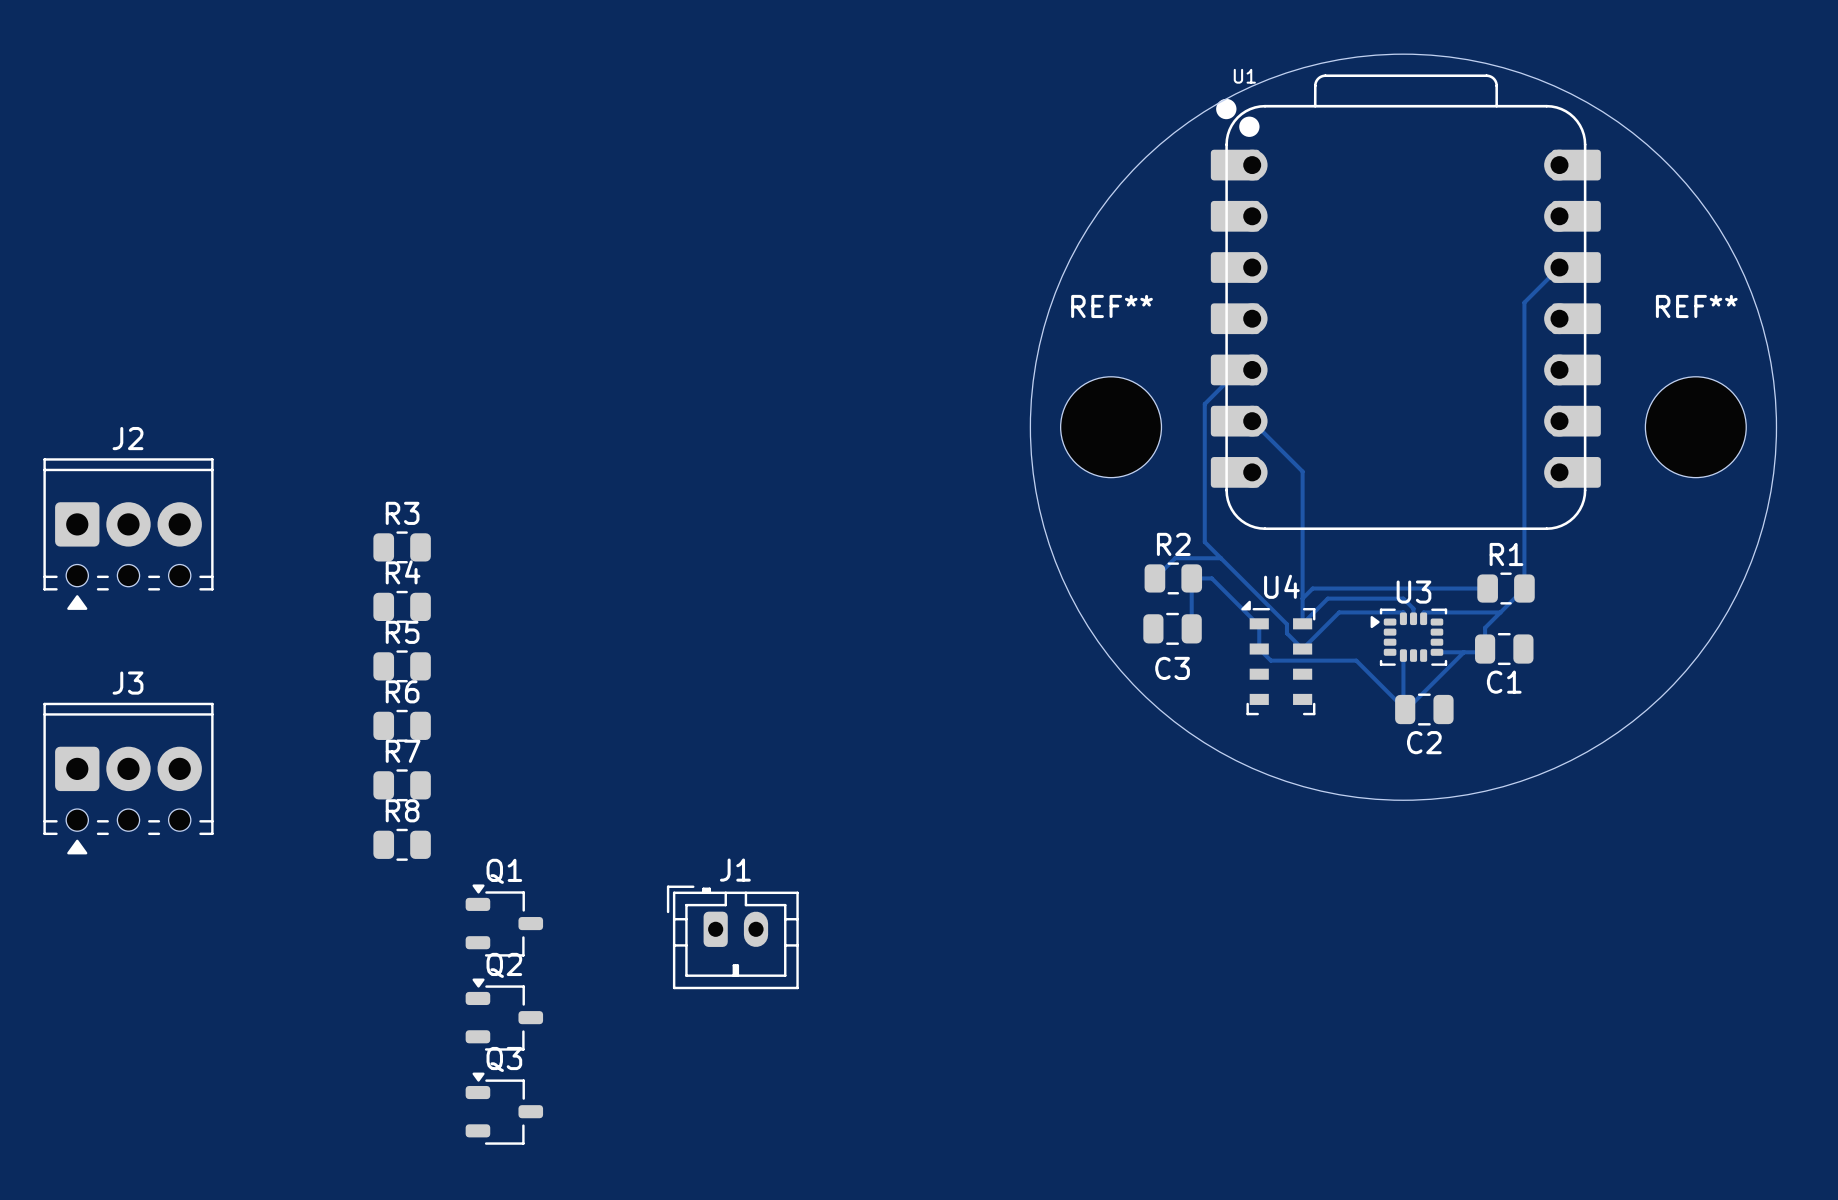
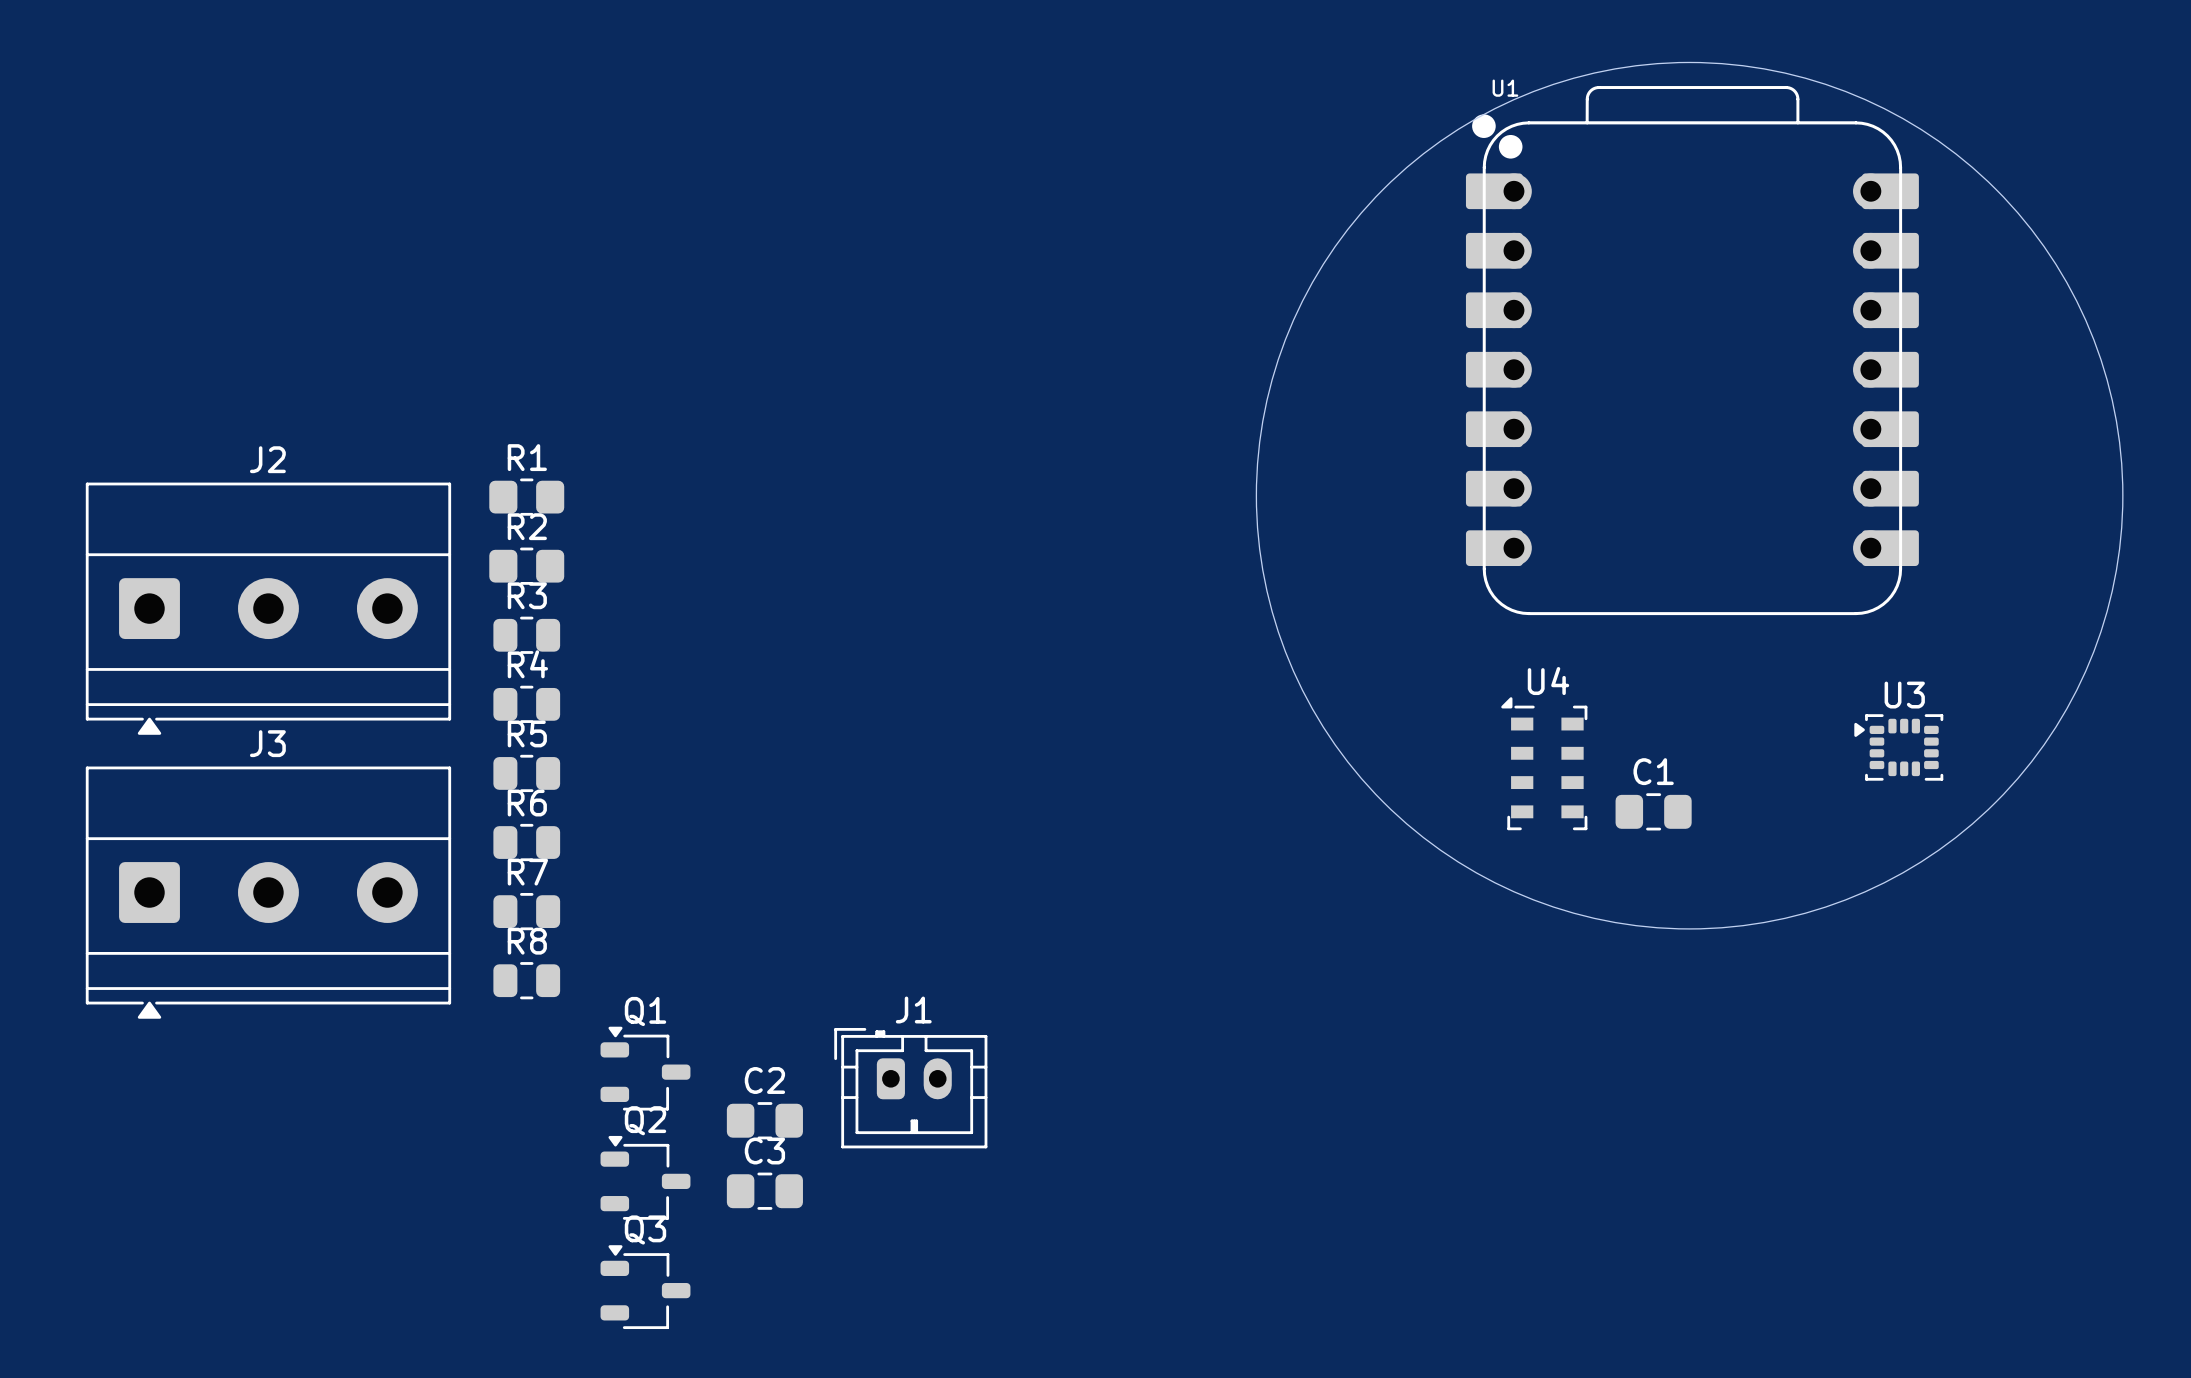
track: (1559, 267) (1524, 302) (1524, 588) (1485, 627) (1485, 649) (1481, 652) (1436, 652) -> none
track: (1252, 369) (1238, 369) (1204, 404) (1204, 542) (1286, 624) (1286, 633) (1302, 649) (1339, 612) (1403, 612) (1403, 618) -> none
track: (1252, 421) (1302, 471) (1302, 623) (1327, 598) (1403, 598) (1413, 608) (1413, 618) -> none
REF**: (1111, 427) -> none
REF**: (1695, 427) -> none
J2 footprint: [43, 458, 214, 610] -> [85, 482, 452, 735]
track: (1220, 558) (1175, 558) (1154, 578) -> none
R2 footprint: [1144, 562, 1203, 595] -> [489, 547, 565, 585]
R1 footprint: [1477, 572, 1535, 605] -> [489, 478, 565, 516]
track: (1487, 588) (1312, 588) (1302, 598) -> none
C3 footprint: [1143, 612, 1202, 645] -> [726, 1172, 803, 1210]
track: (1500, 612) (1423, 612) (1423, 618) -> none
track: (1196, 623) (1191, 628) (1191, 578) (1211, 578) (1259, 623) (1259, 649) (1270, 660) (1356, 660) (1405, 709) (1463, 652) -> none
C1 footprint: [1475, 632, 1534, 666] -> [1615, 793, 1692, 831]
U3 position: (1408, 637) -> (1898, 747)
track: (1403, 655) (1403, 707) -> none
C3 name position: C3 (1172, 668) -> C3 (764, 1150)
C1 name position: C1 (1504, 682) -> C1 (1653, 771)
C2 footprint: [1395, 693, 1454, 726] -> [726, 1102, 803, 1140]
J3 footprint: [43, 702, 214, 855] -> [85, 766, 452, 1019]
C2 name position: C2 (1424, 742) -> C2 (764, 1080)

